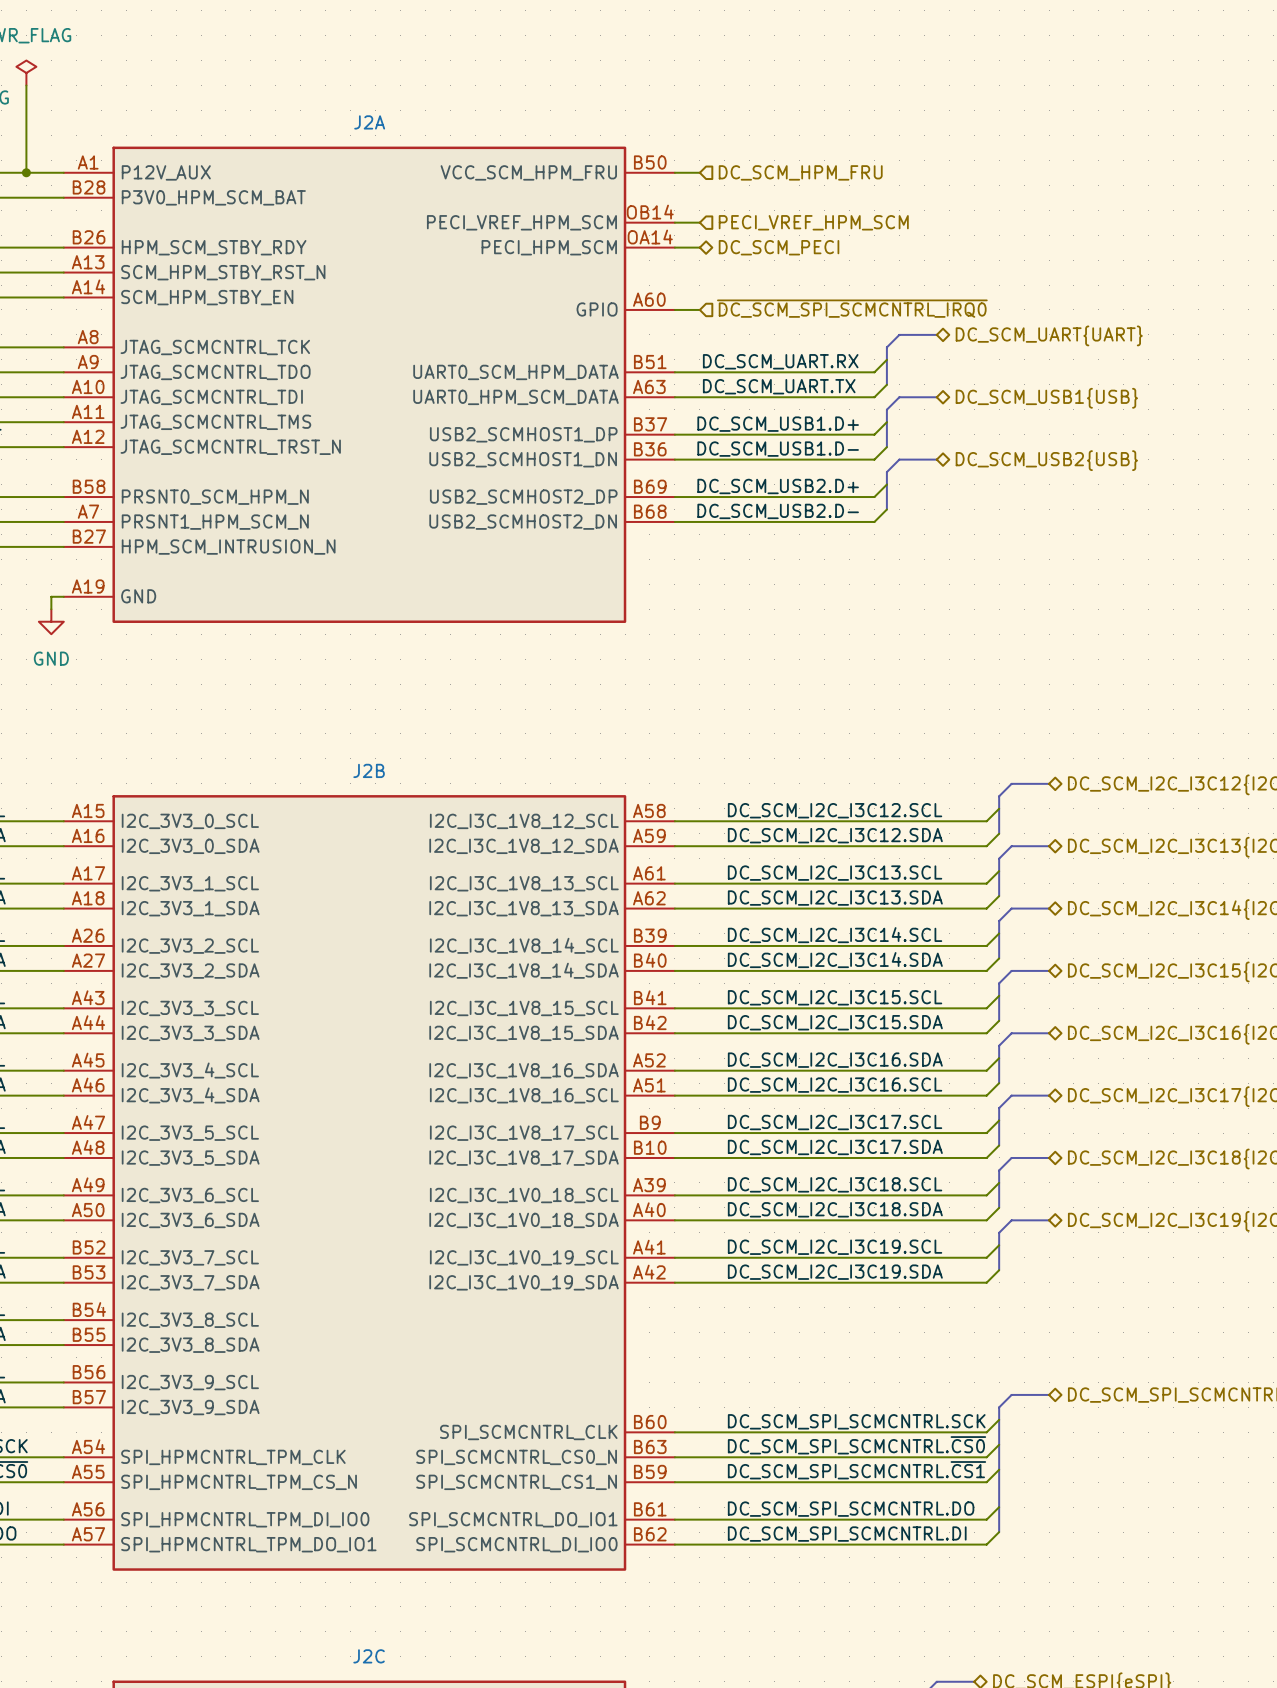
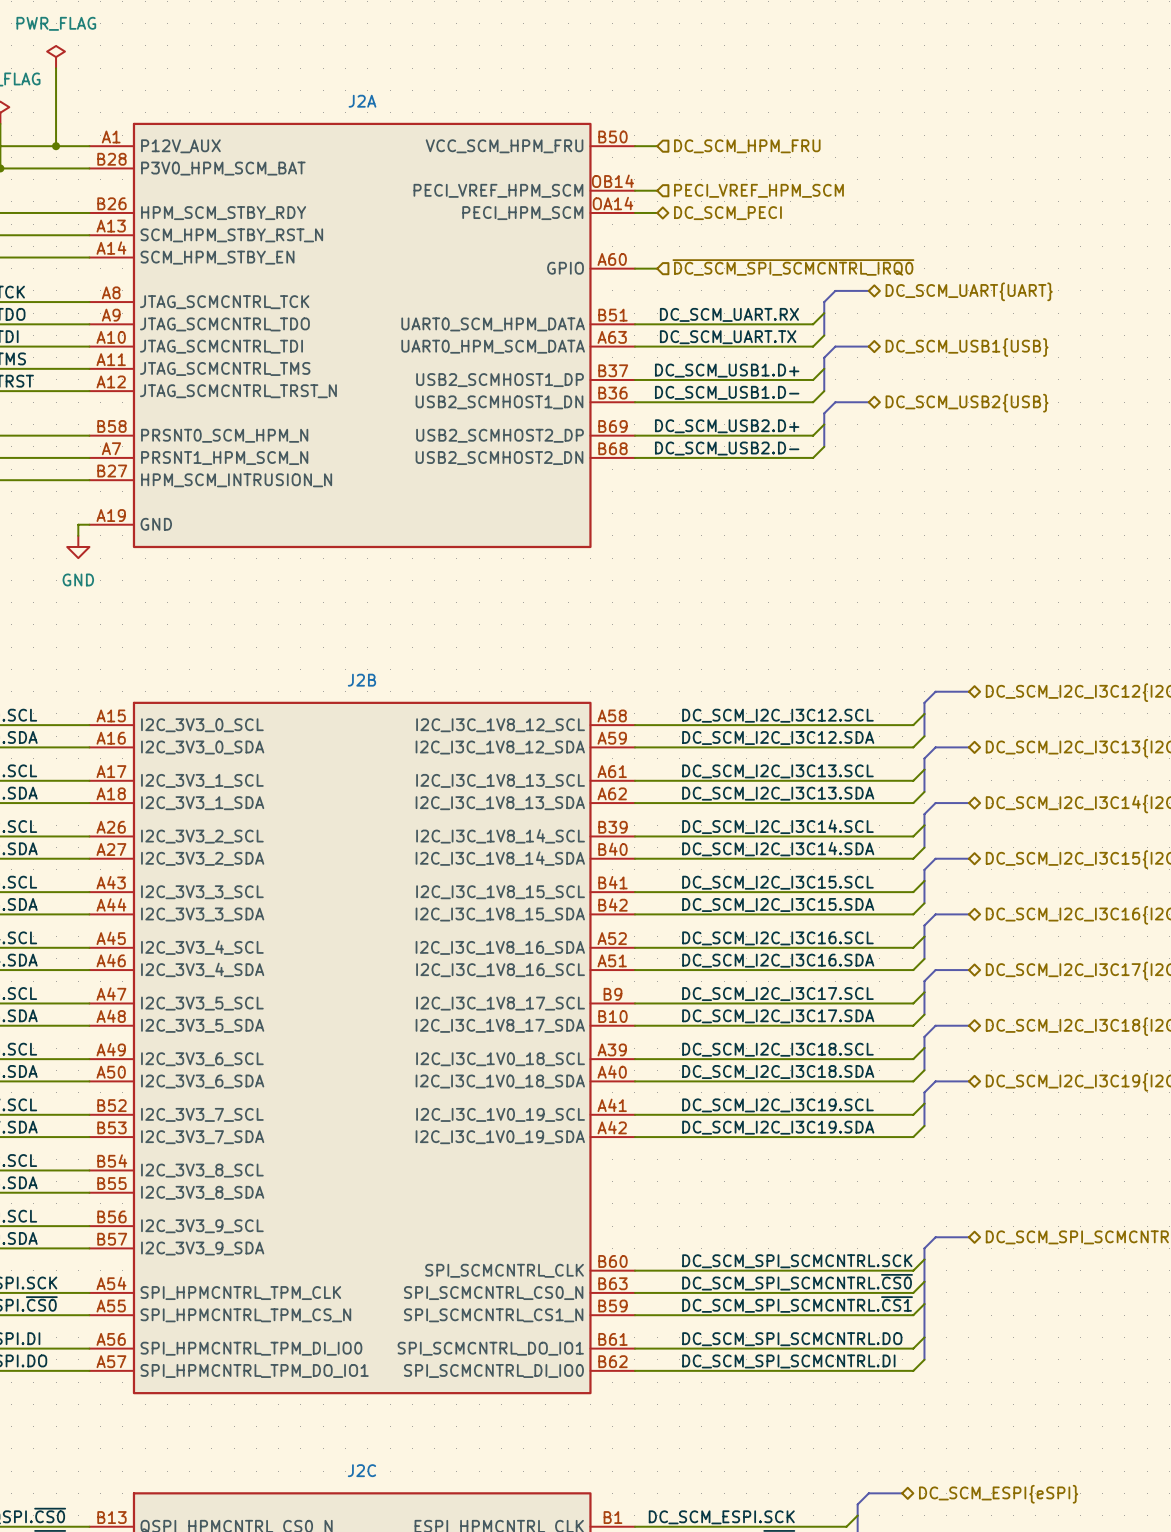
label: DC_SCM_I2C_I3C16.SDA (835, 1060) -> DC_SCM_I2C_I3C16.SCL (777, 938)
label: DC_SCM_I2C_I3C16.SCL (835, 1085) -> DC_SCM_I2C_I3C16.SDA (778, 960)

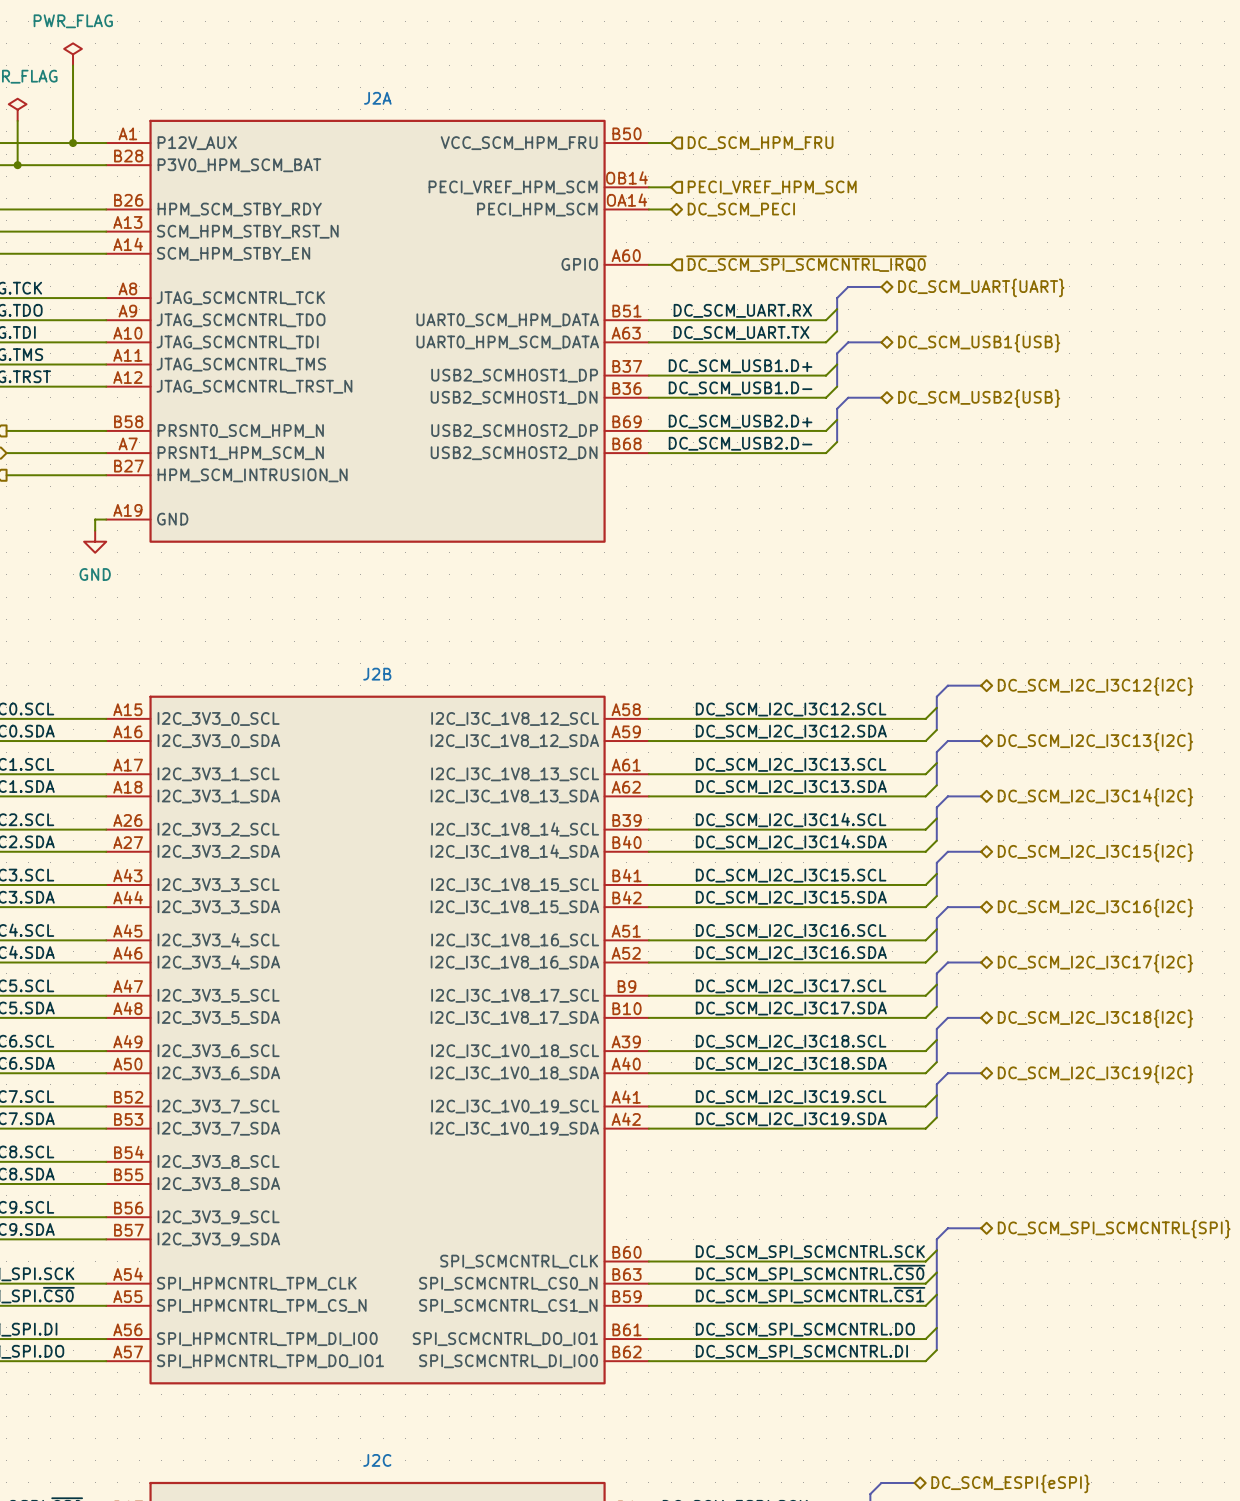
J2B pin number: A52 (612, 938) -> A51 (626, 931)
J2B pin name: I2C_I3C_1V8_16_SDA (500, 947) -> I2C_I3C_1V8_16_SCL (515, 940)
J2B pin number: A51 (612, 960) -> A52 (626, 953)
J2B pin name: I2C_I3C_1V8_16_SCL (500, 970) -> I2C_I3C_1V8_16_SDA (514, 962)

